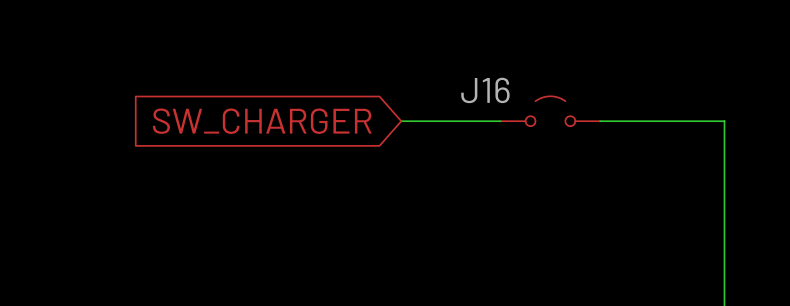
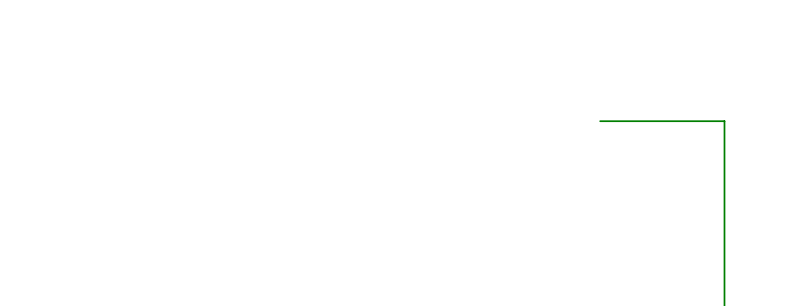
J16: (550, 111) -> none
global label: SW_CHARGER (262, 121) -> none
wire: (401, 121) (500, 121) -> none

